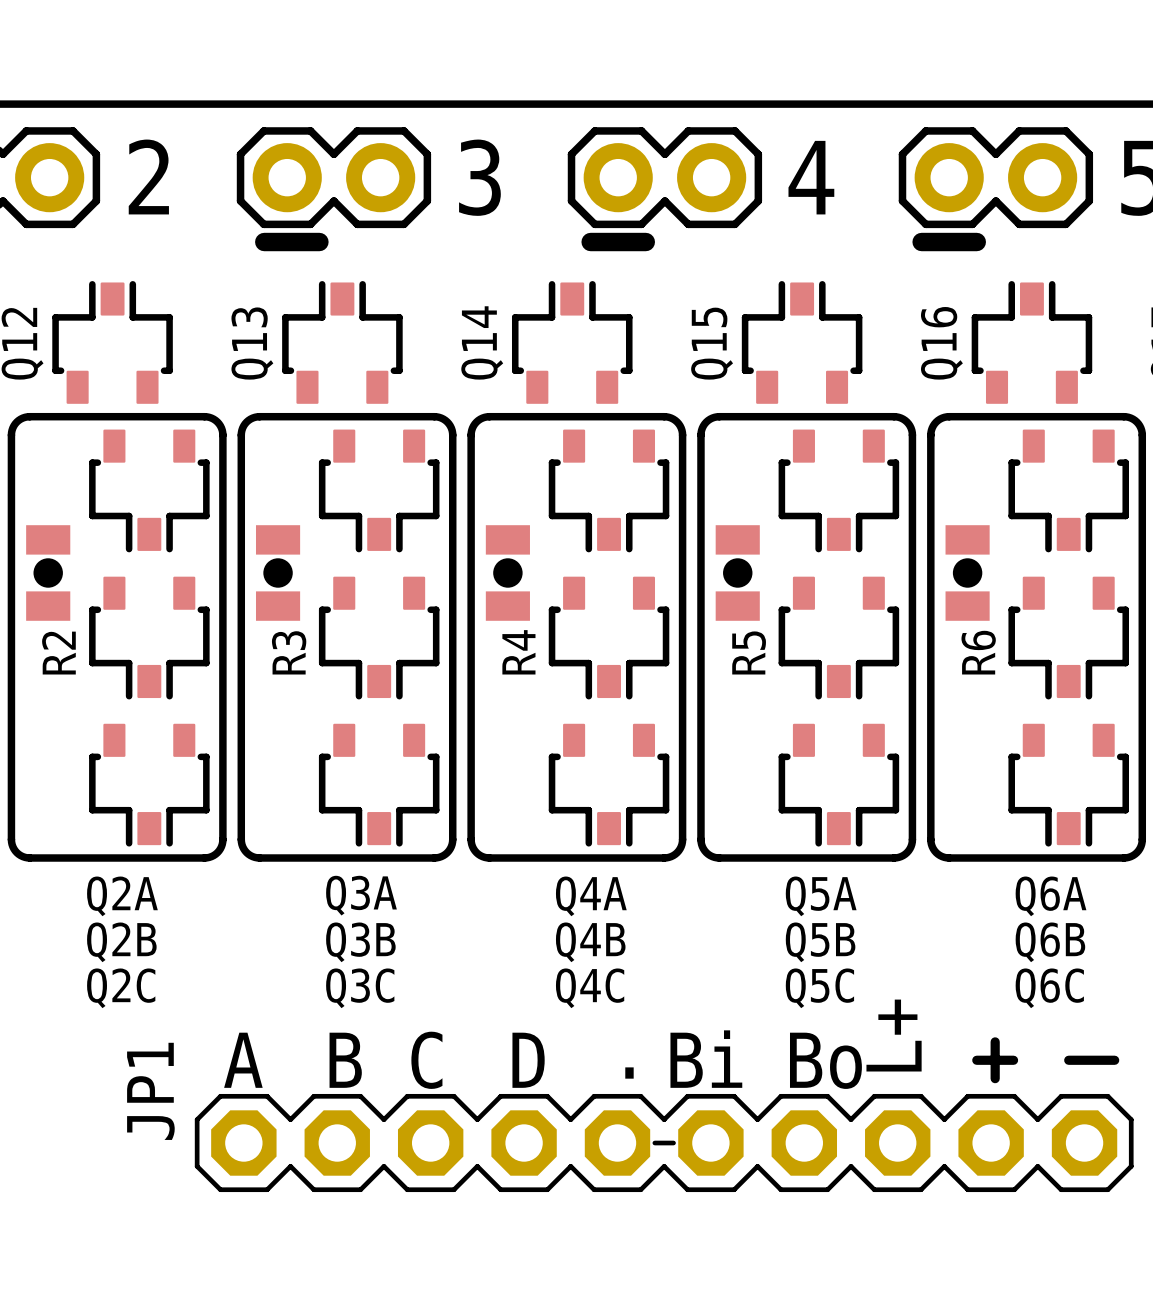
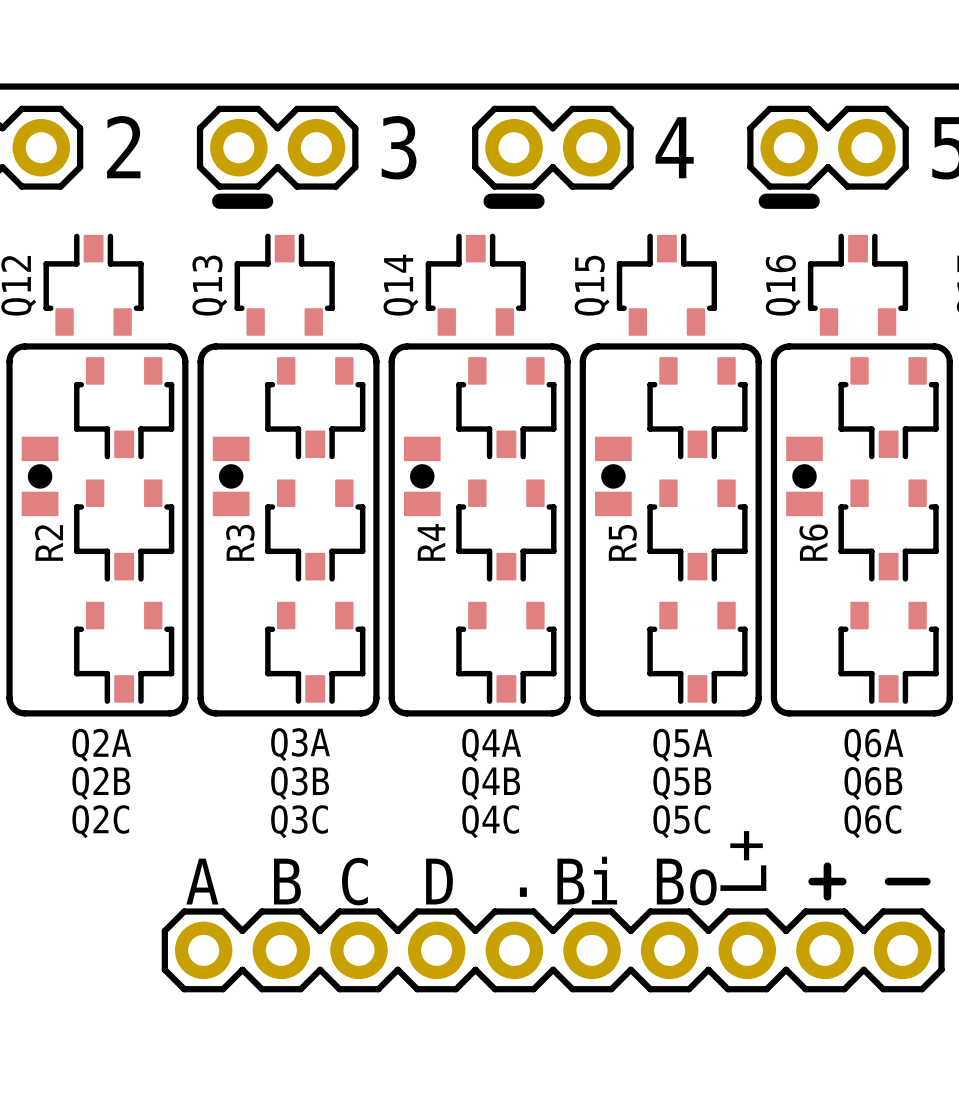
JP1: (664, 1143) -> none
part: none -> (553, 950)

